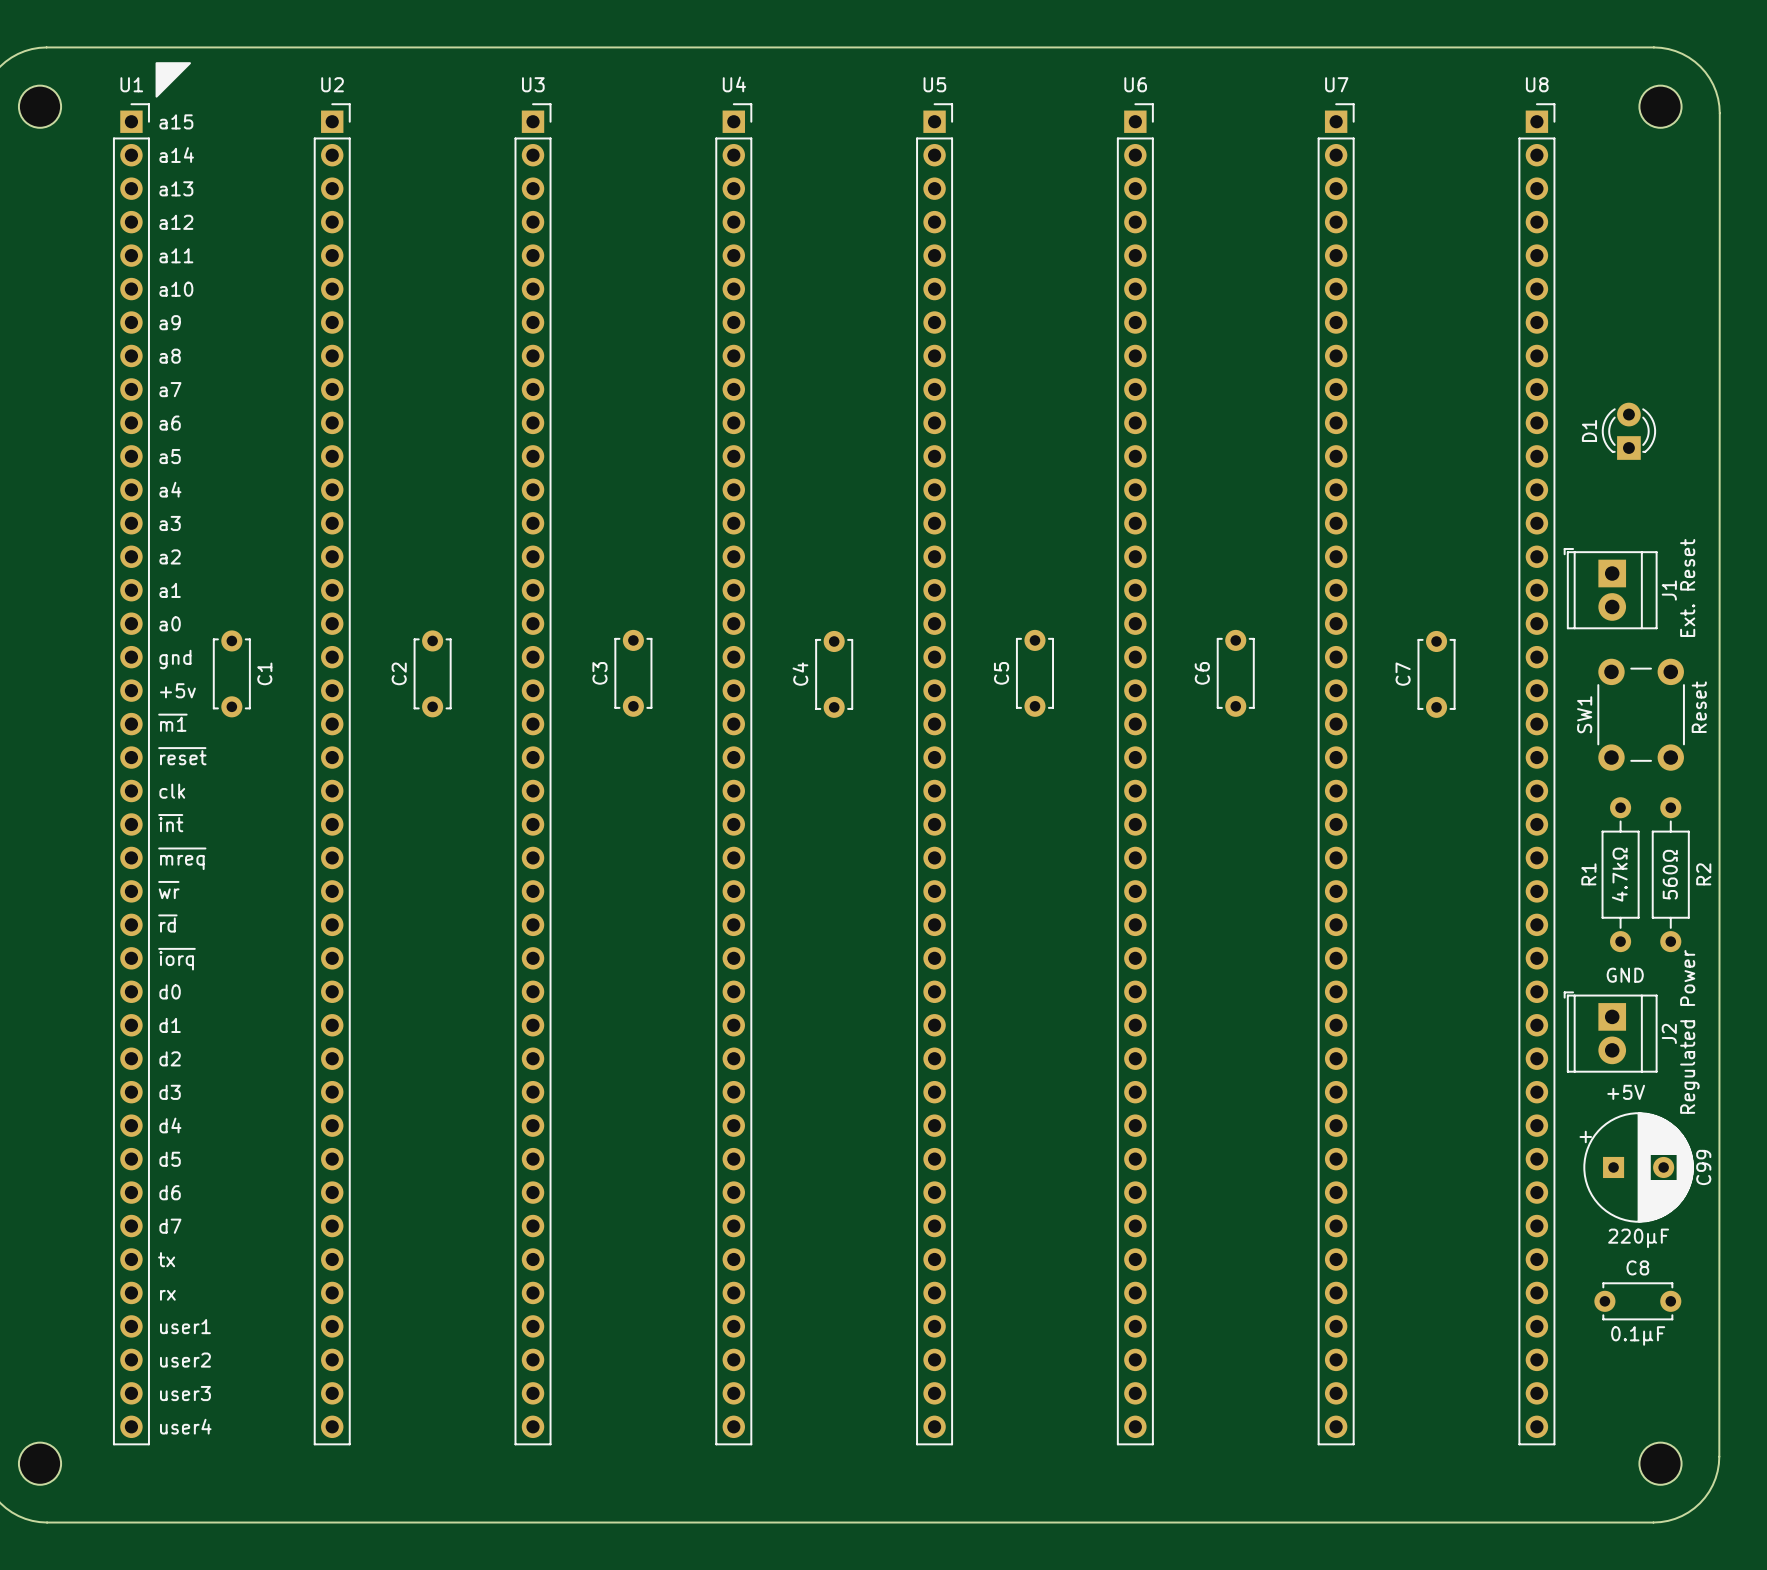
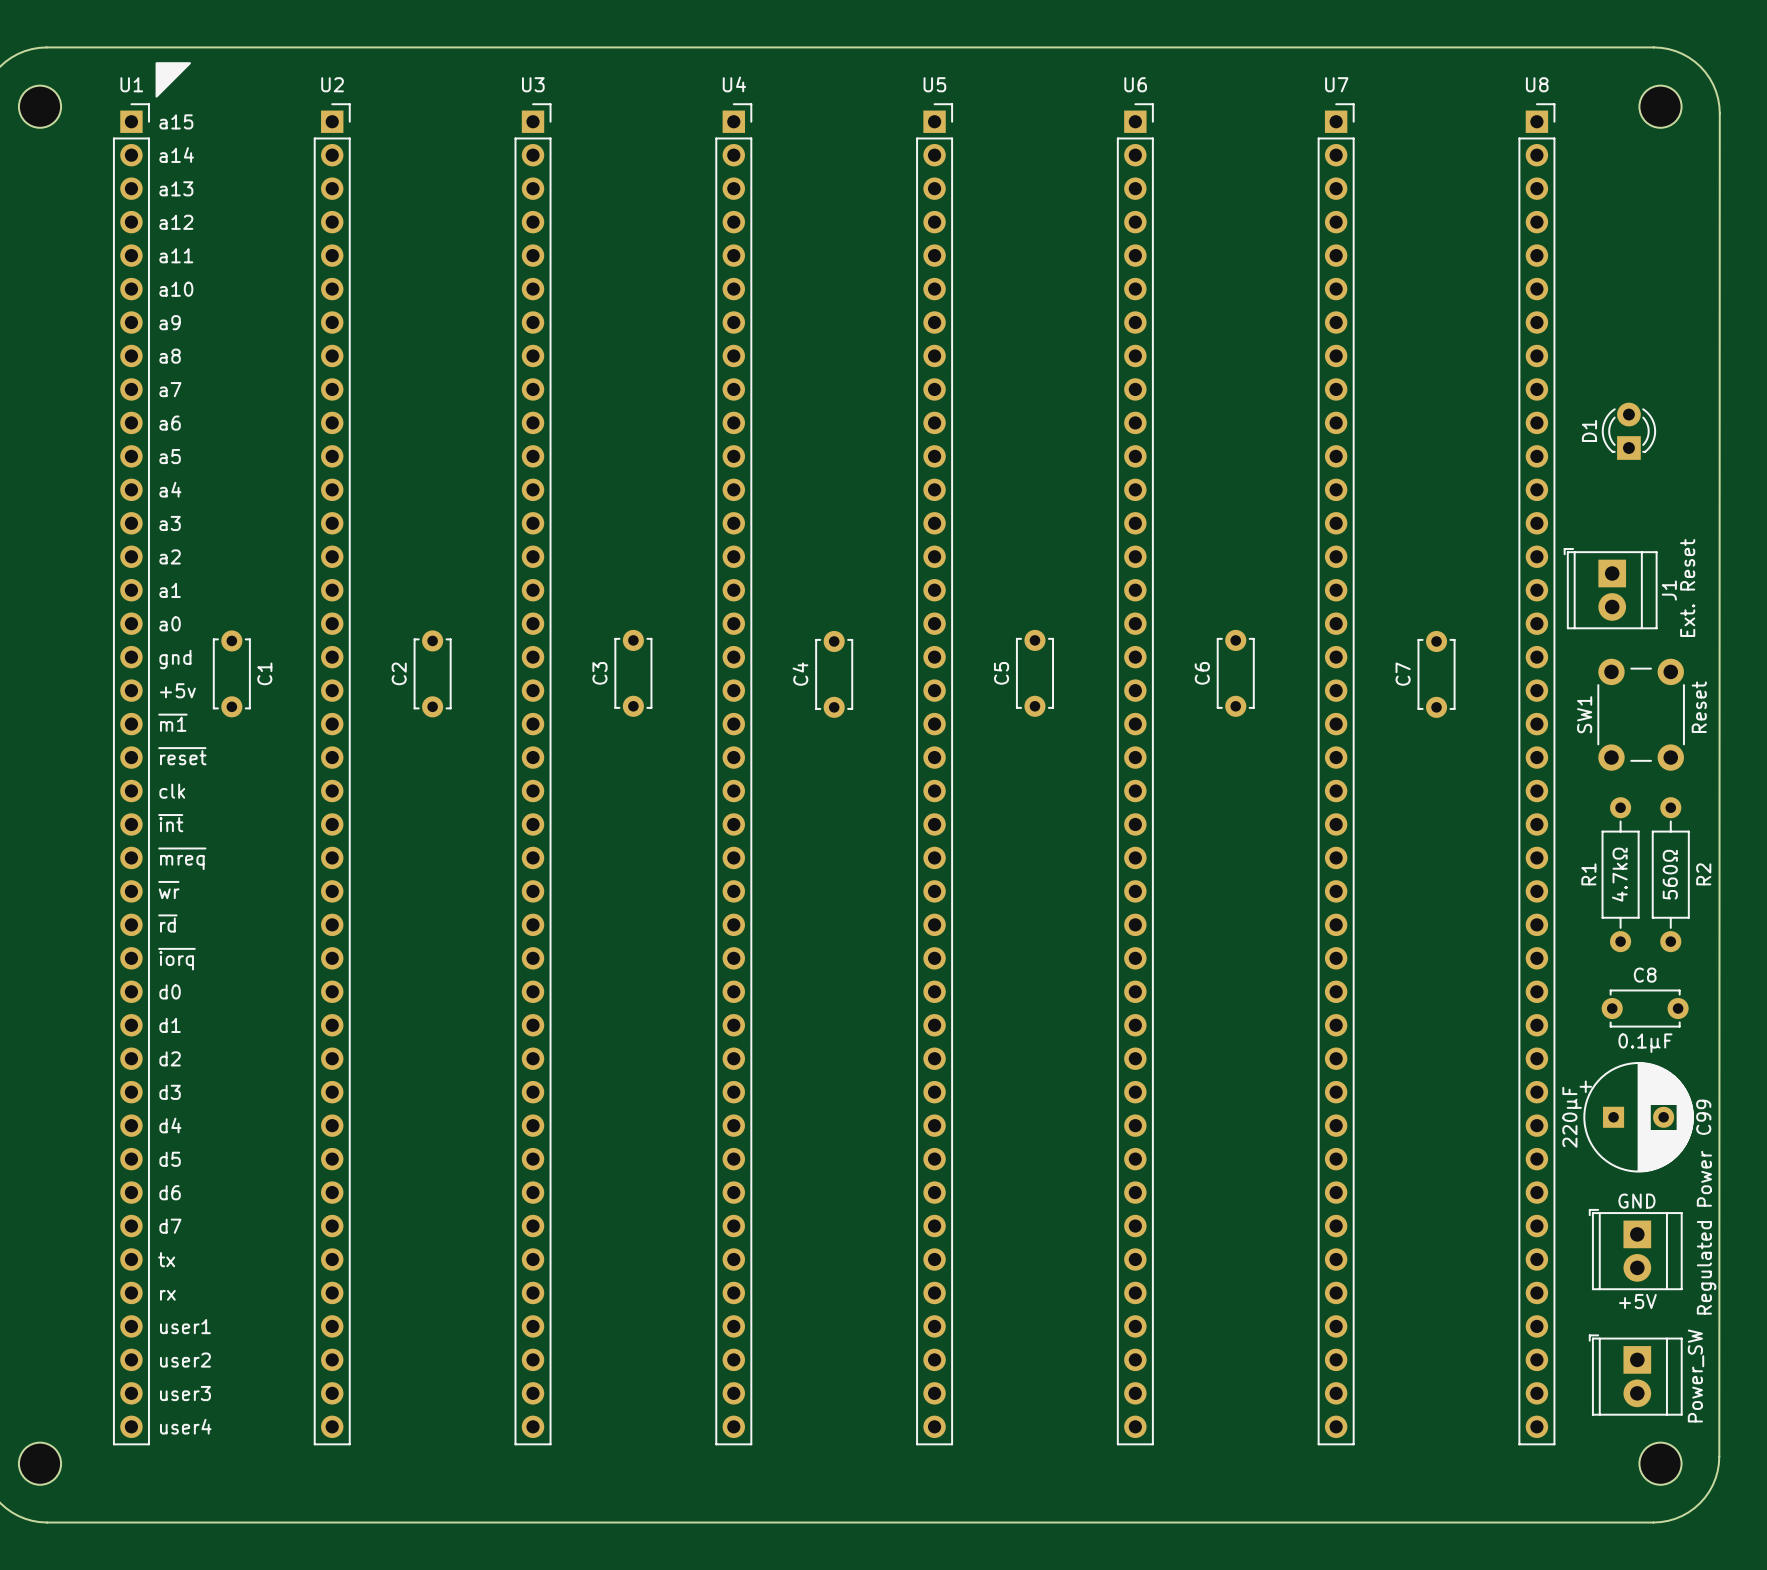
text position: GND (1625, 975) -> GND (1636, 1201)
text position: Regulated Power (1689, 1031) -> Regulated Power (1706, 1232)
J2: (1610, 1032) -> none
text position: +5V (1626, 1092) -> +5V (1637, 1301)
C99 position: (1636, 1167) -> (1636, 1117)
C99 value rotation: 0° (1638, 1238) -> 90° counterclockwise (1572, 1117)
C99 value position: 220µF (1638, 1238) -> 220µF (1572, 1117)
part: none -> (1635, 1249)
C8 position: (1637, 1301) -> (1645, 1008)
part: none -> Power_SW (1635, 1375)

